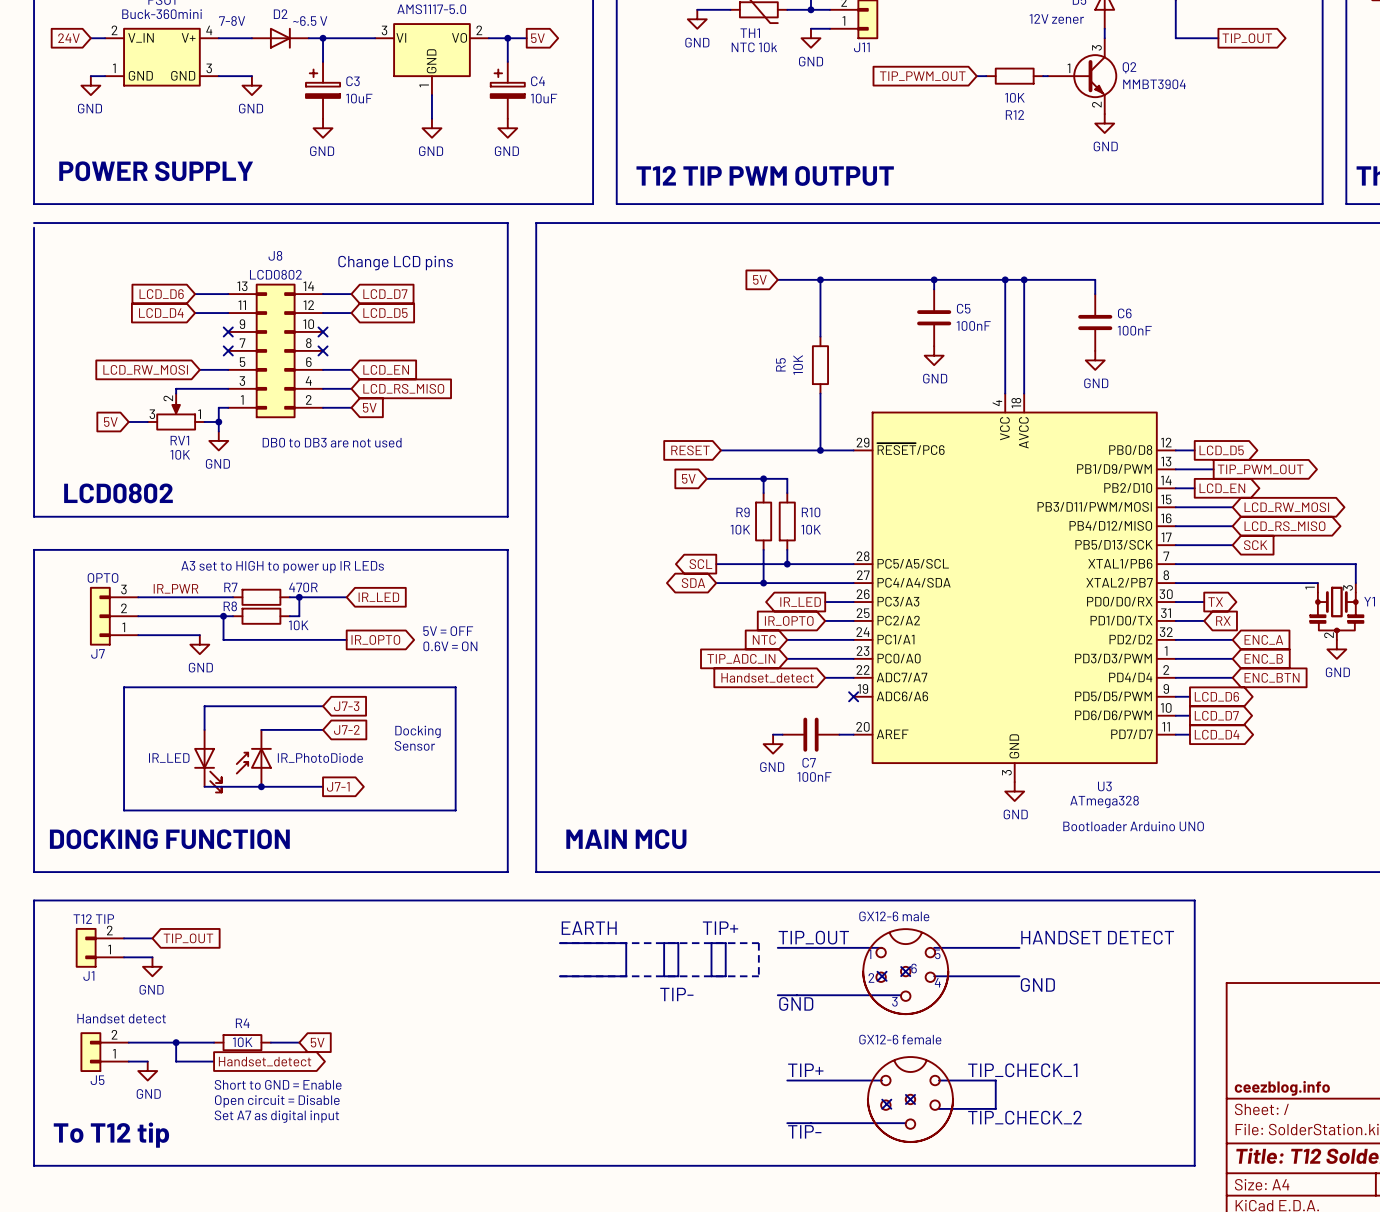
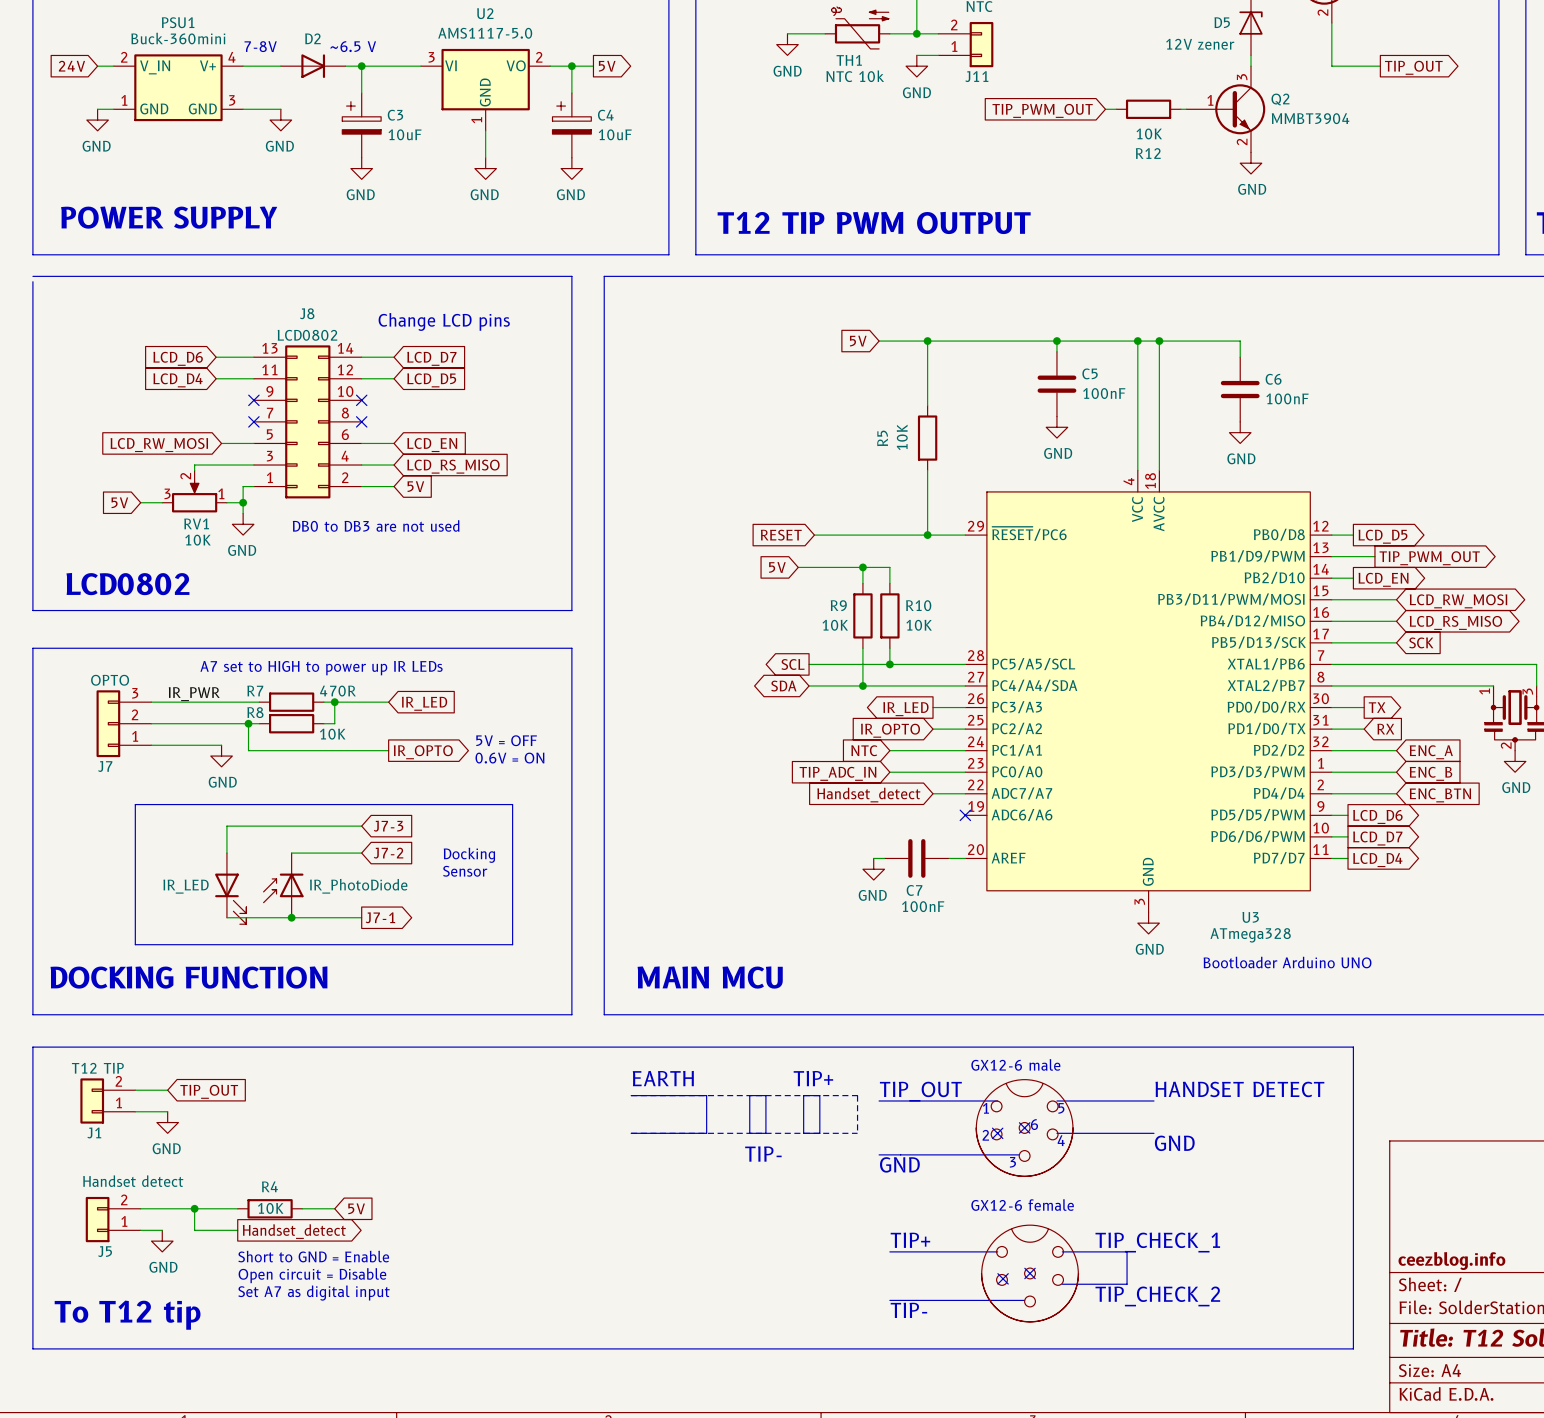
text: A3 set to HIGH to power up IR LEDs (282, 567) -> A7 set to HIGH to power up IR LEDs (321, 668)

